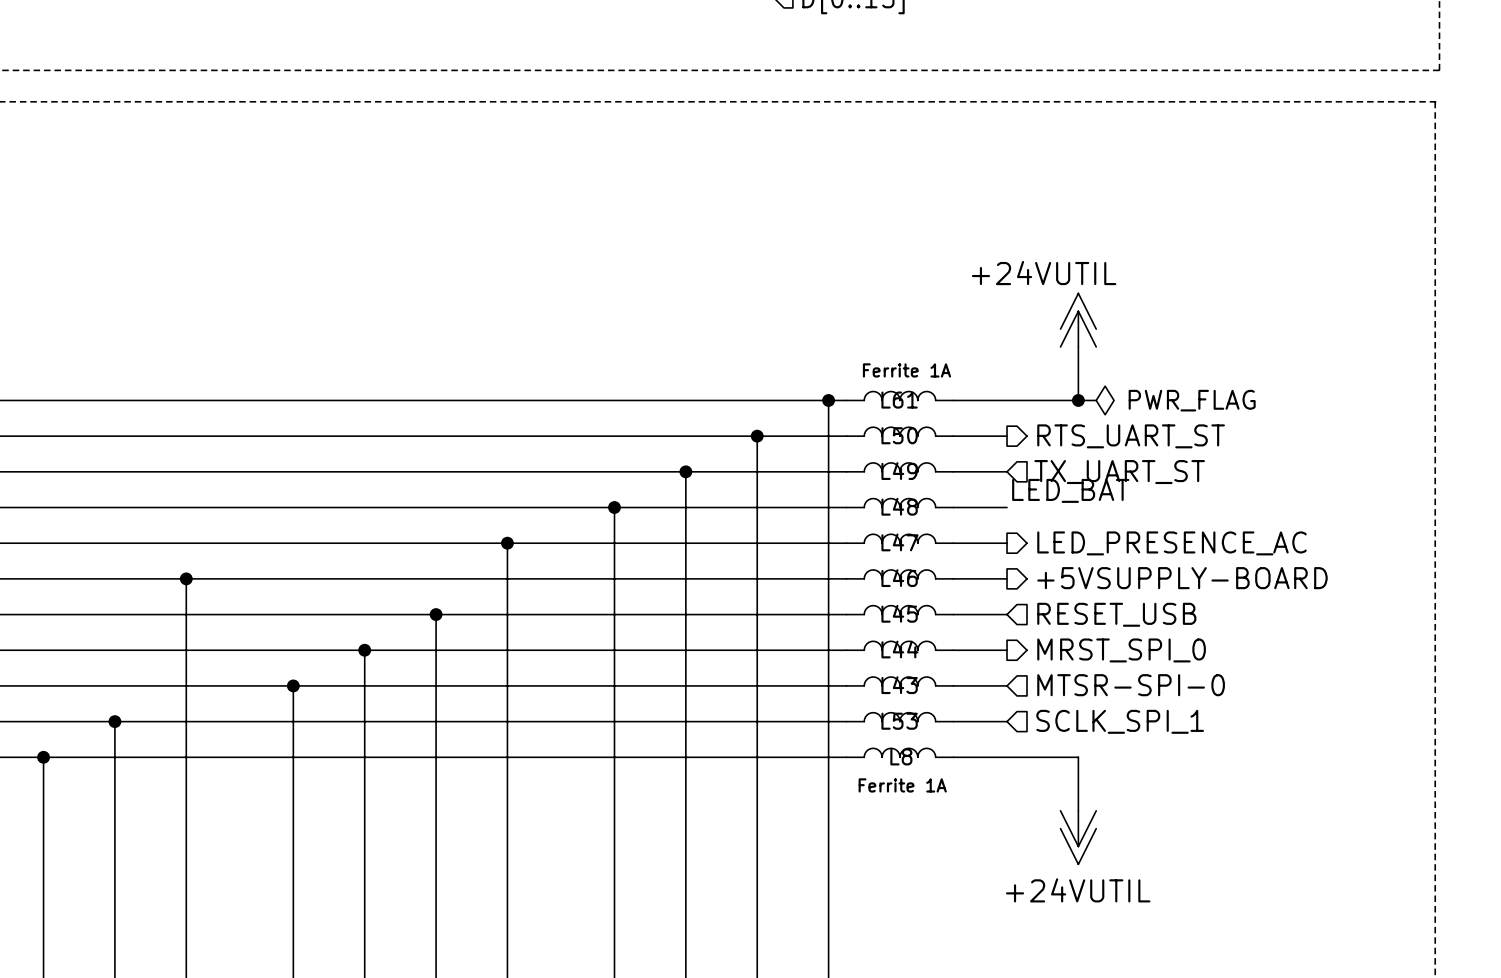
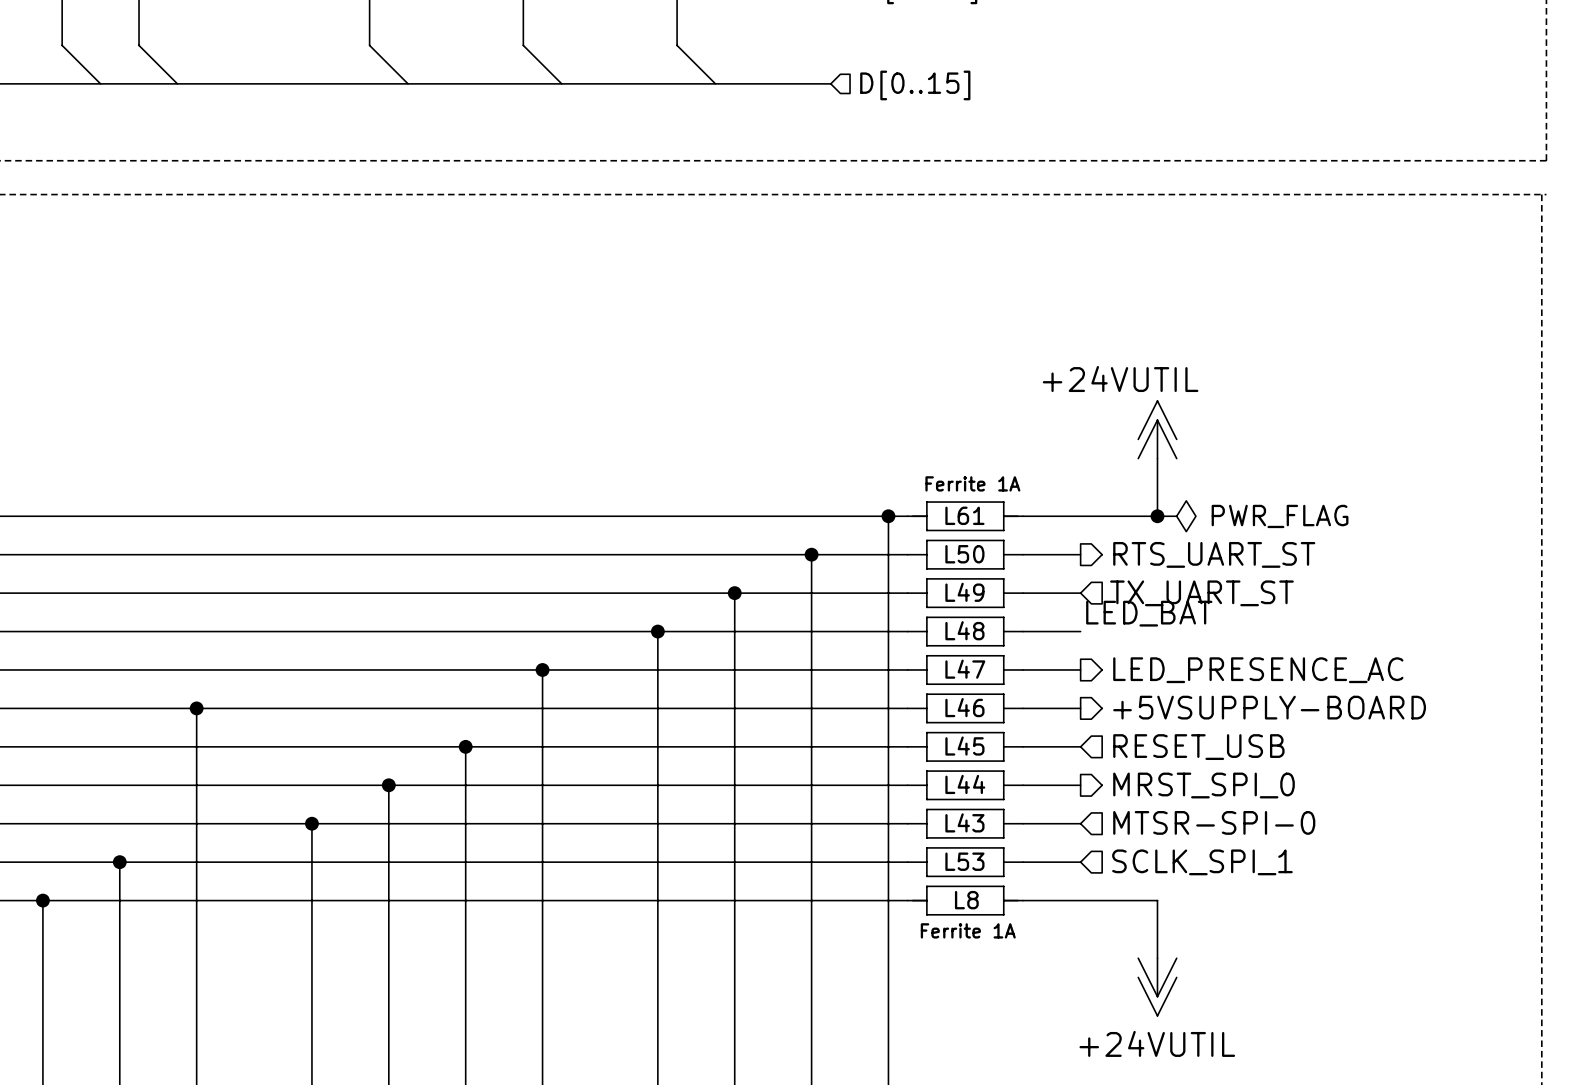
L61 symbol: [846, 391, 954, 401] -> [907, 502, 1023, 531]
L50 symbol: [846, 427, 954, 437] -> [907, 540, 1023, 569]
L49 symbol: [846, 462, 954, 472] -> [907, 578, 1023, 608]
L48 symbol: [846, 498, 954, 508] -> [907, 617, 1023, 646]
L47 symbol: [846, 534, 954, 544] -> [907, 655, 1023, 685]
L46 symbol: [846, 569, 954, 579] -> [907, 694, 1023, 723]
L45 symbol: [846, 605, 954, 615] -> [907, 732, 1023, 762]
L44 symbol: [846, 641, 954, 651] -> [907, 771, 1023, 800]
L43 symbol: [846, 677, 954, 686] -> [907, 809, 1023, 838]
L53 symbol: [846, 712, 954, 722] -> [907, 847, 1023, 877]
L8 symbol: [846, 748, 954, 758] -> [907, 886, 1023, 915]

